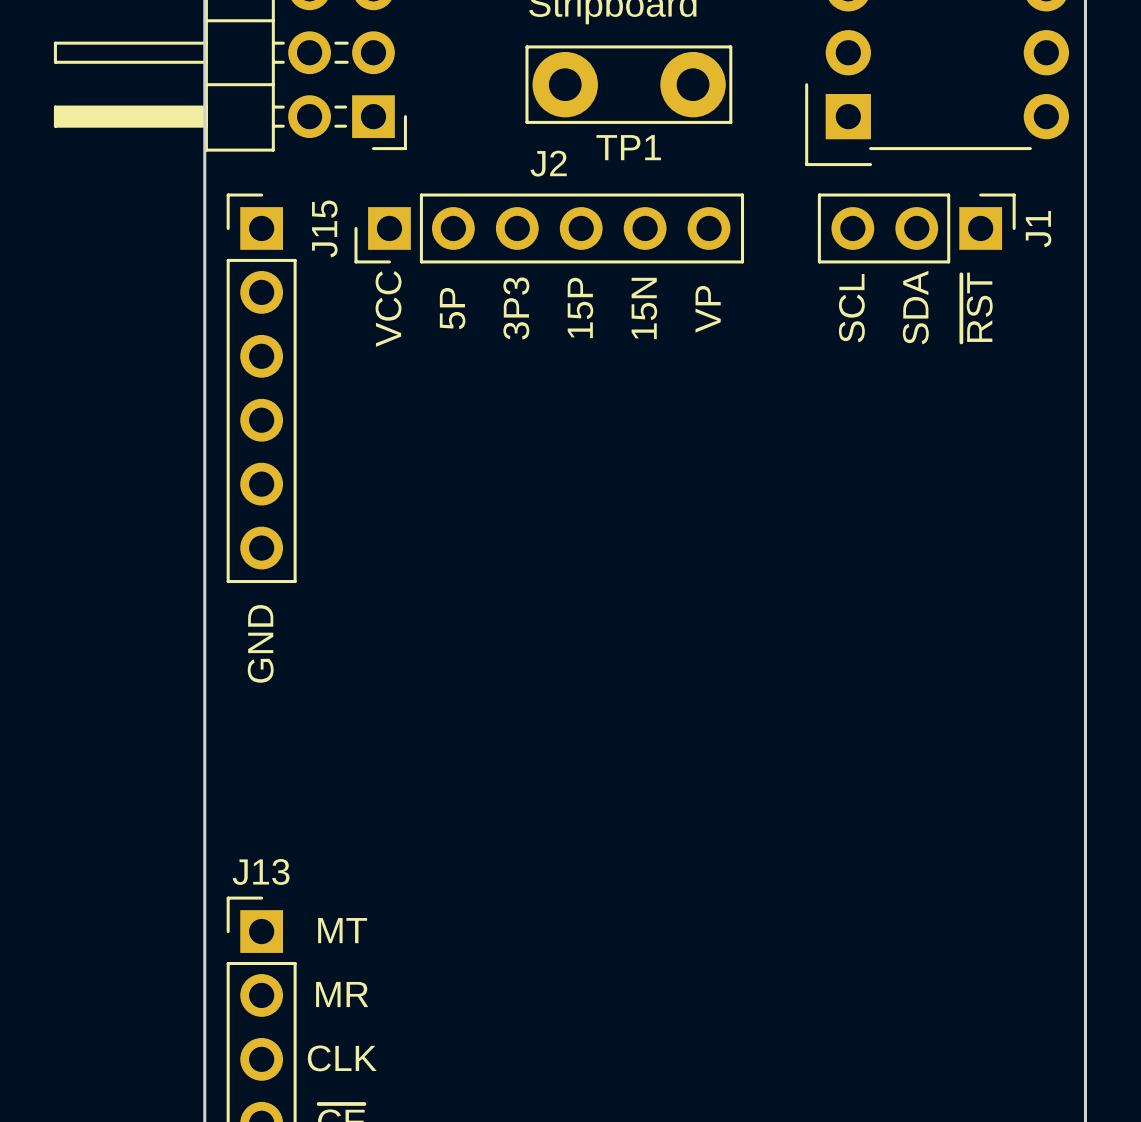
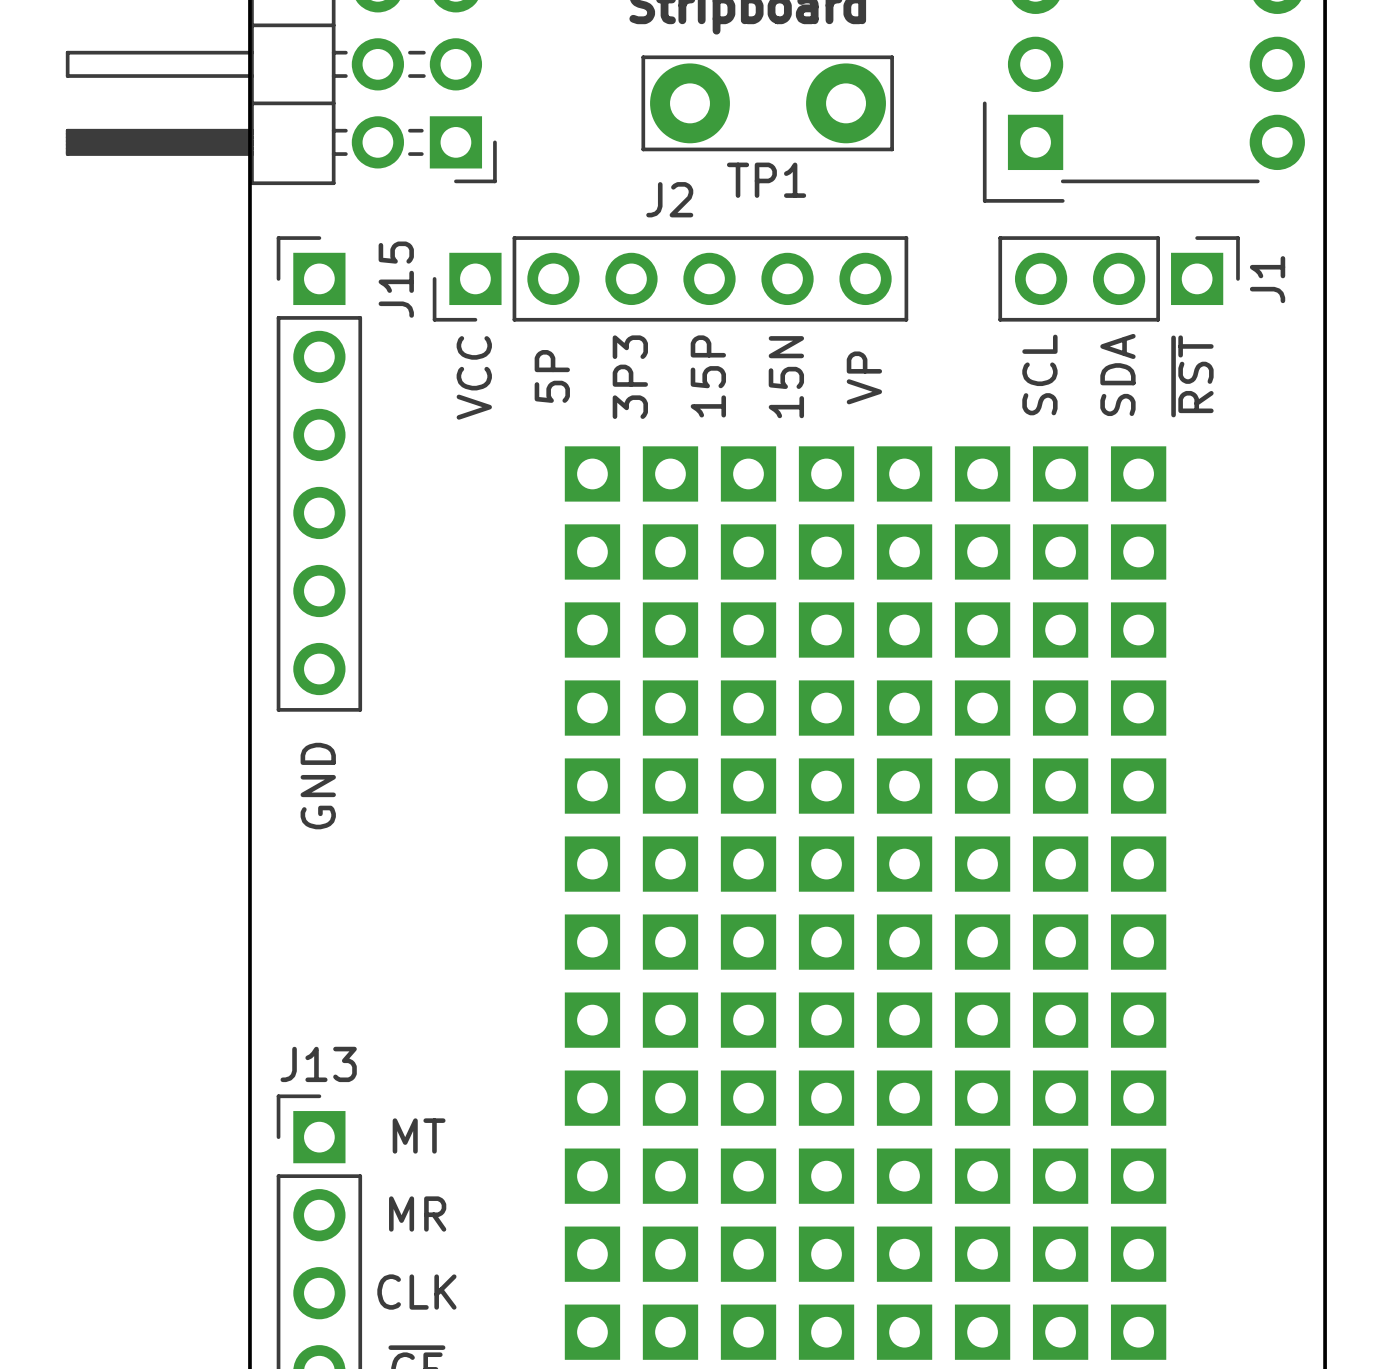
part: none -> (709, 591)
part: none -> (1021, 591)
part: none -> (709, 903)
part: none -> (1021, 903)
part: none -> (709, 1215)
part: none -> (1021, 1215)

